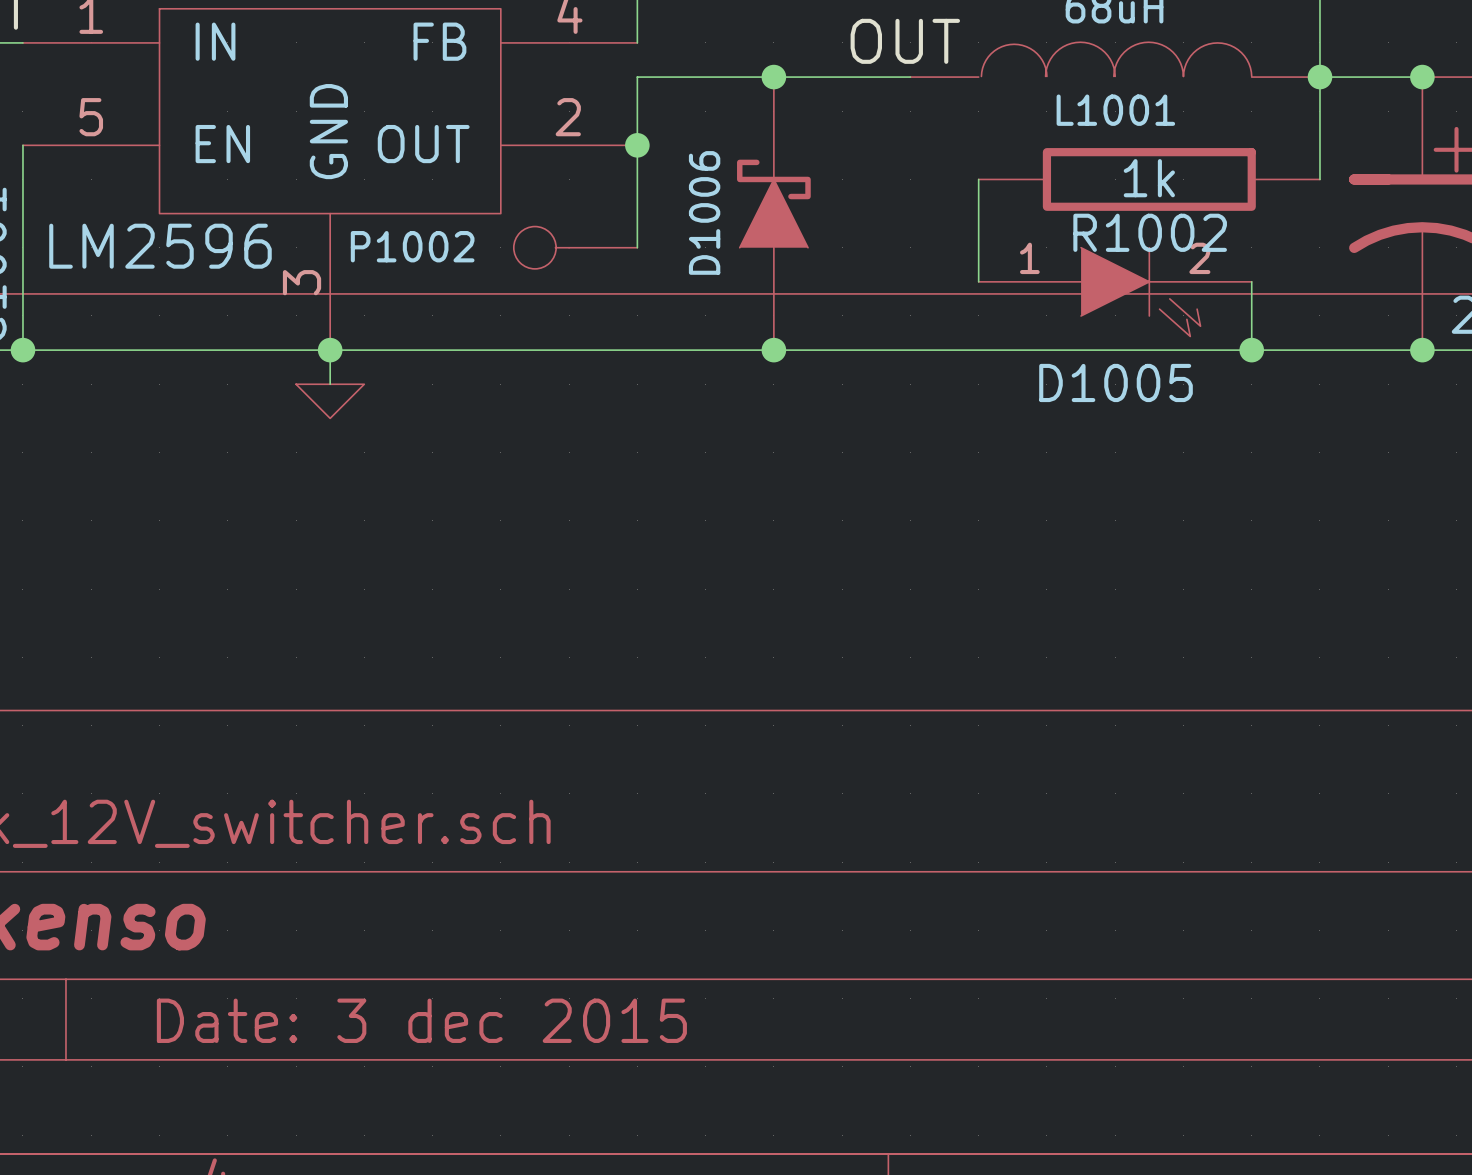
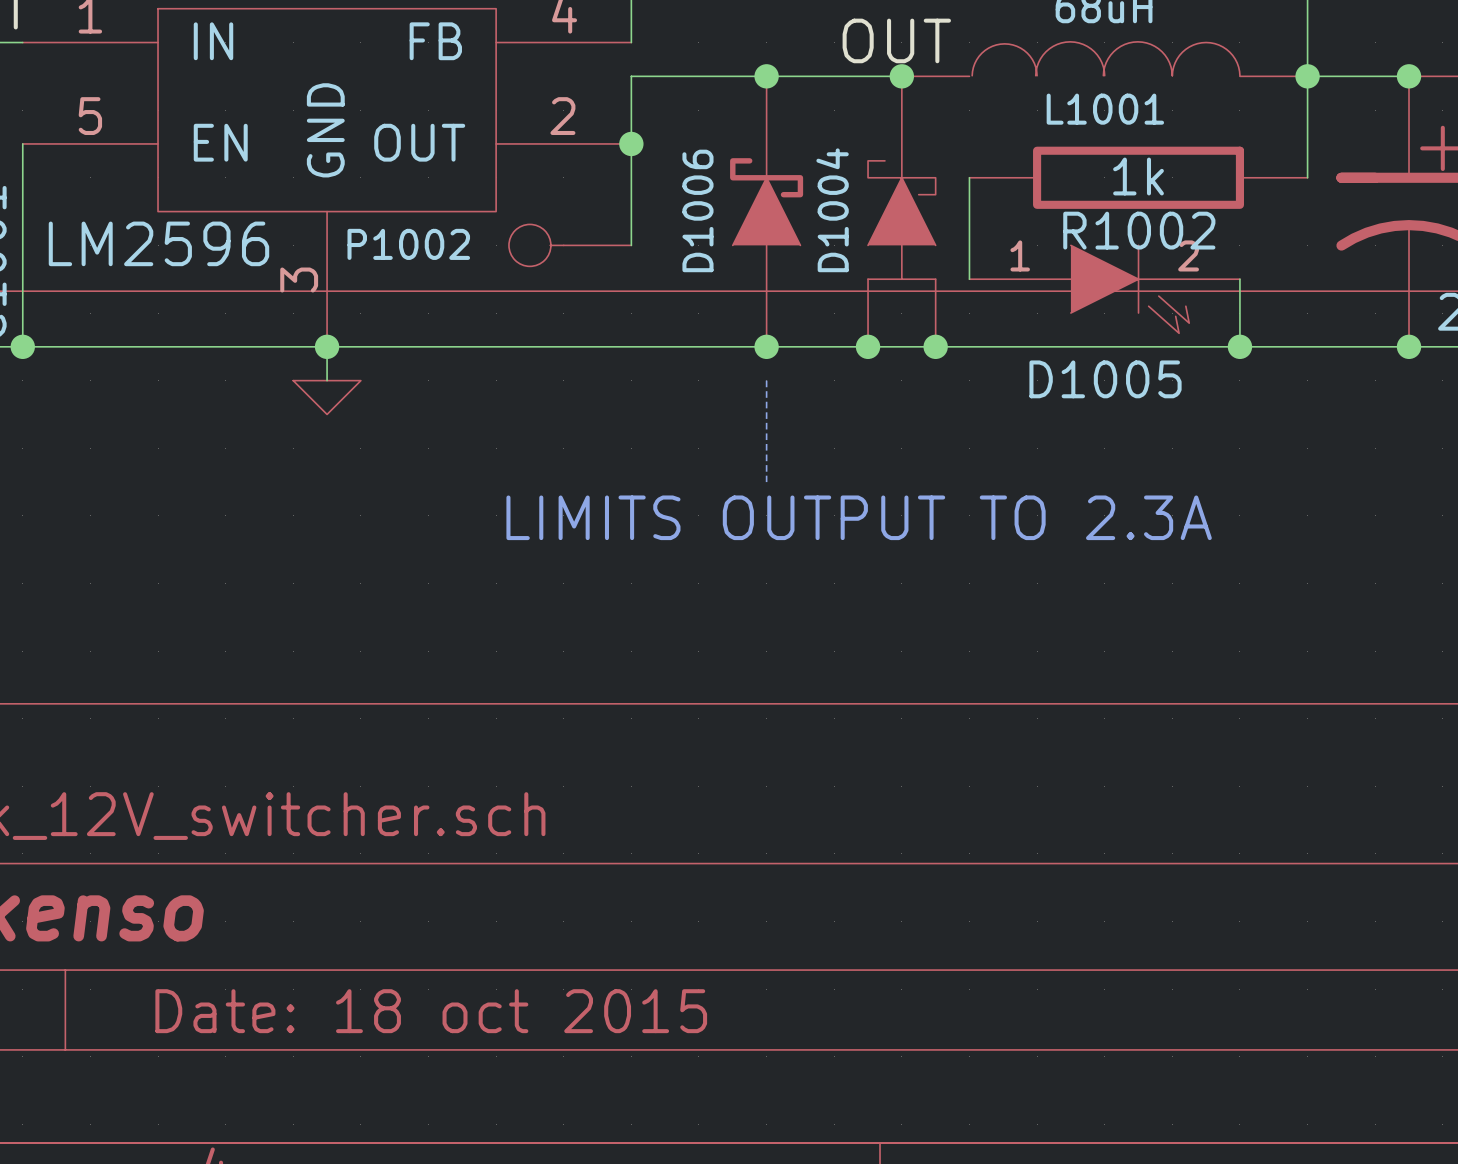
junction: none -> (901, 76)
D1004: none -> (901, 211)
junction: none -> (868, 346)
junction: none -> (935, 346)
line: none -> (766, 380) (766, 482)
text: none -> LIMITS OUTPUT TO 2.3A (859, 517)
title block: Date: 3 dec 2015 (421, 1020) -> Date: 18 oct 2015 (431, 1011)

